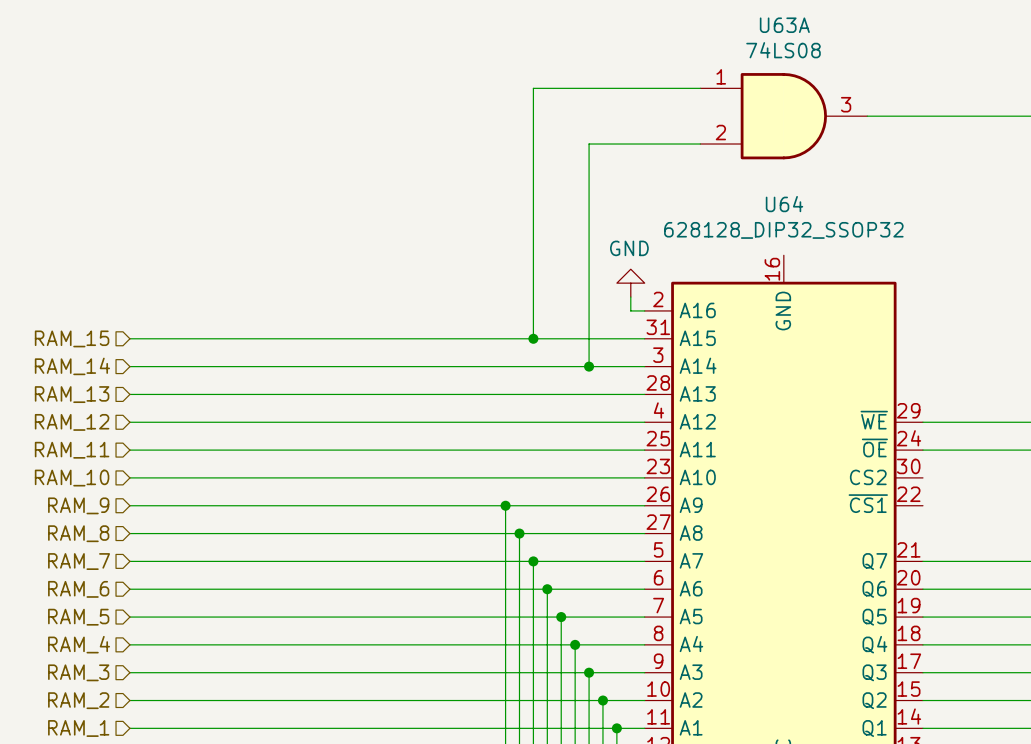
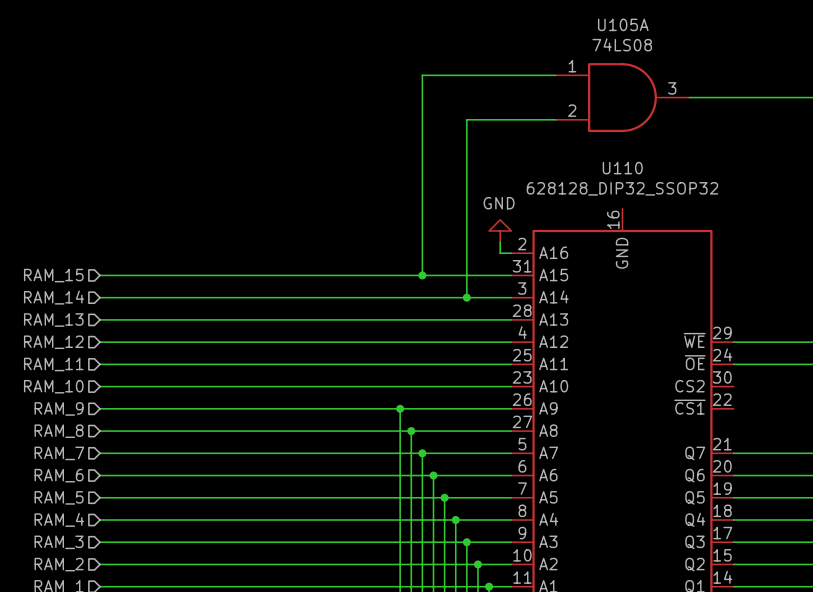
U63A name: U63A (784, 25) -> U105A (623, 24)
U64 name: U64 (784, 204) -> U110 (622, 168)

